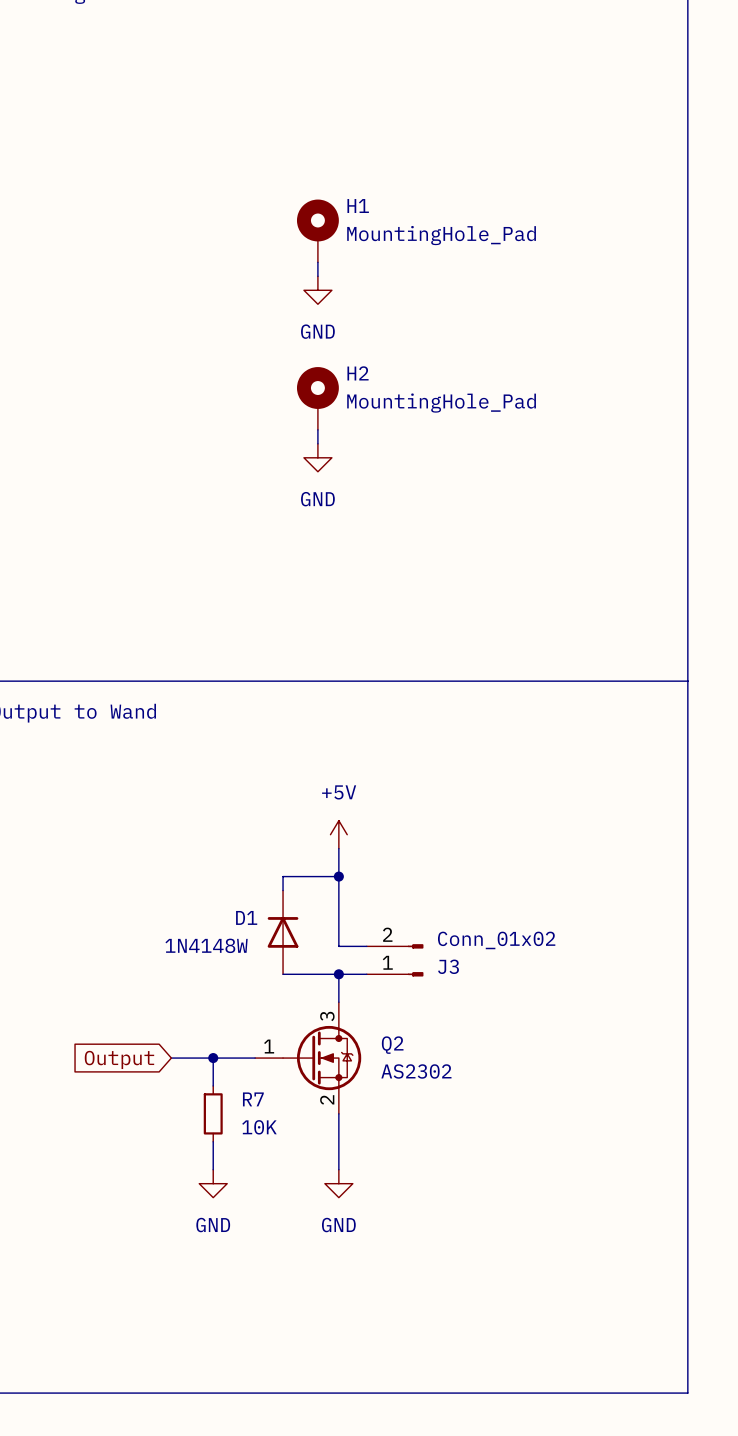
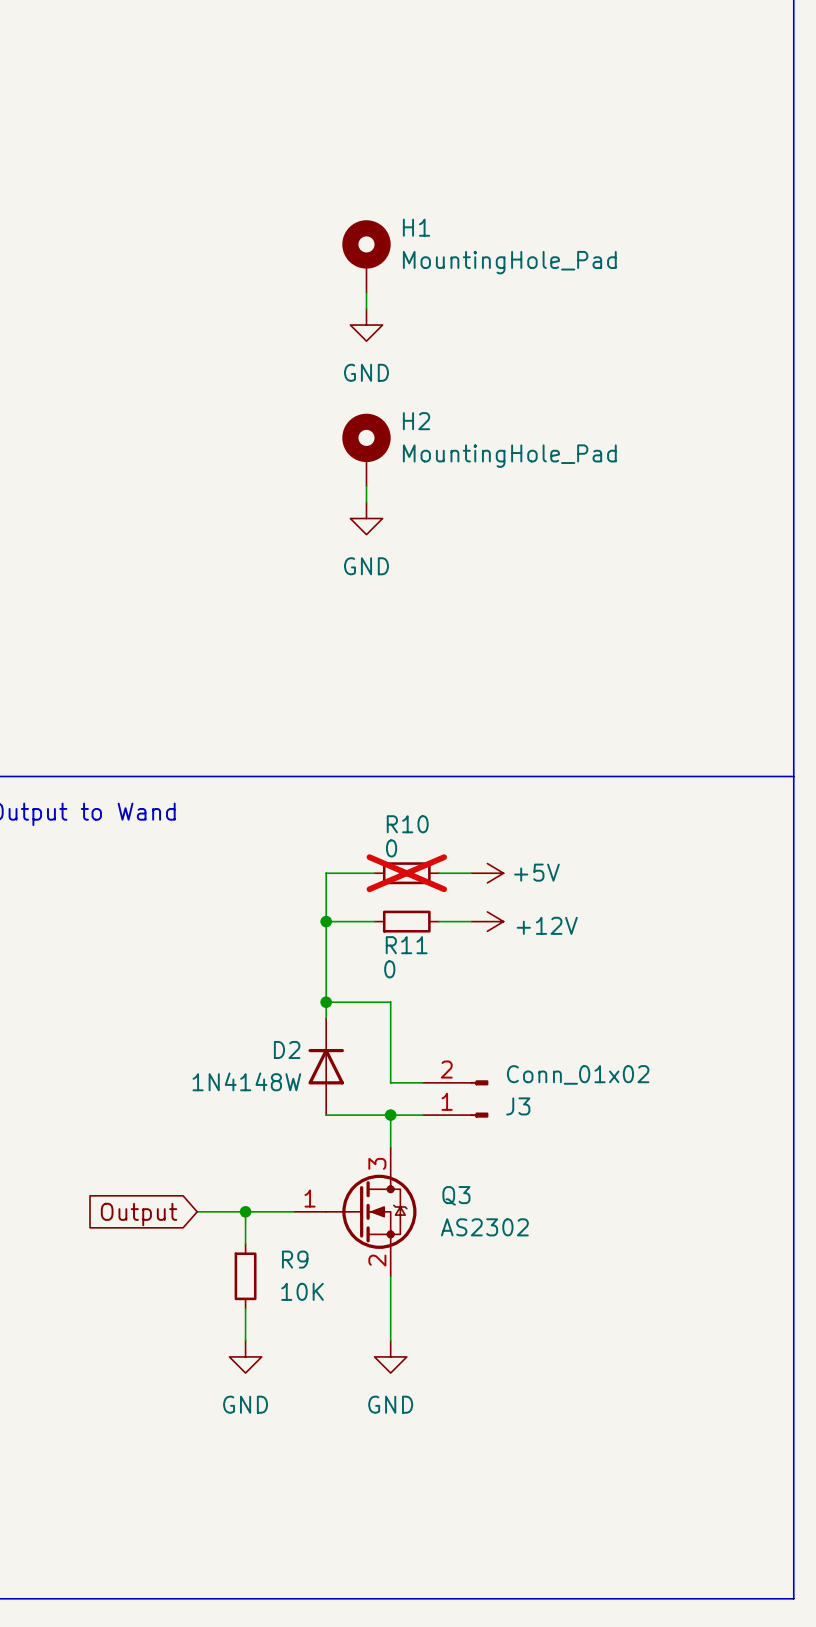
wire: none -> (374, 873) (326, 873) (326, 1002)
R10: none -> 0 (406, 873)
wire: none -> (439, 873) (471, 873)
wire: none -> (326, 921) (374, 921)
junction: none -> (326, 921)
R11: none -> 0 (406, 921)
wire: none -> (439, 921) (471, 921)
power symbol: none -> +12V (487, 921)
power symbol rotation: 0° (338, 834) -> 90° clockwise (487, 873)
power symbol position: +5V (338, 834) -> +5V (487, 873)
wire: (338, 848) (338, 876) -> none
junction: none -> (326, 1002)
junction: (338, 876) -> none
D1 name: D1 (246, 917) -> D2 (287, 1049)
Q2 name: Q2 (392, 1045) -> Q3 (456, 1195)
R7 name: R7 (253, 1099) -> R9 (295, 1259)

